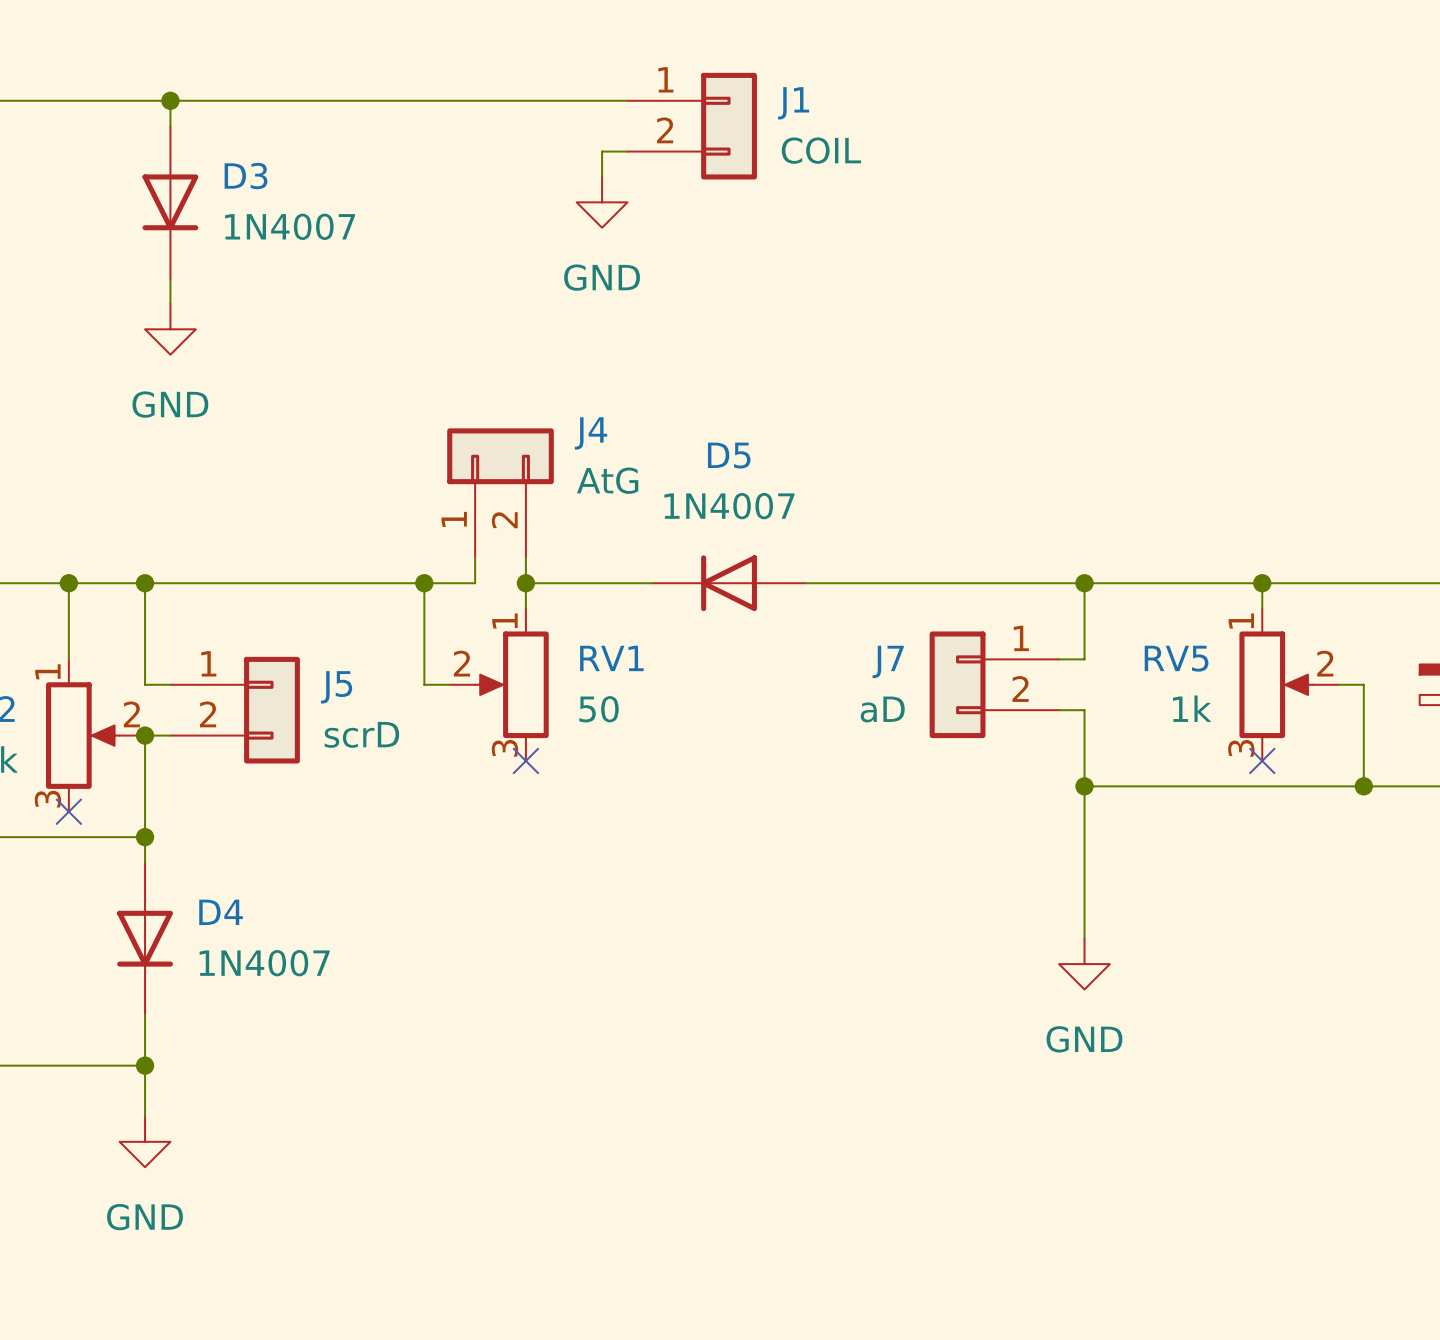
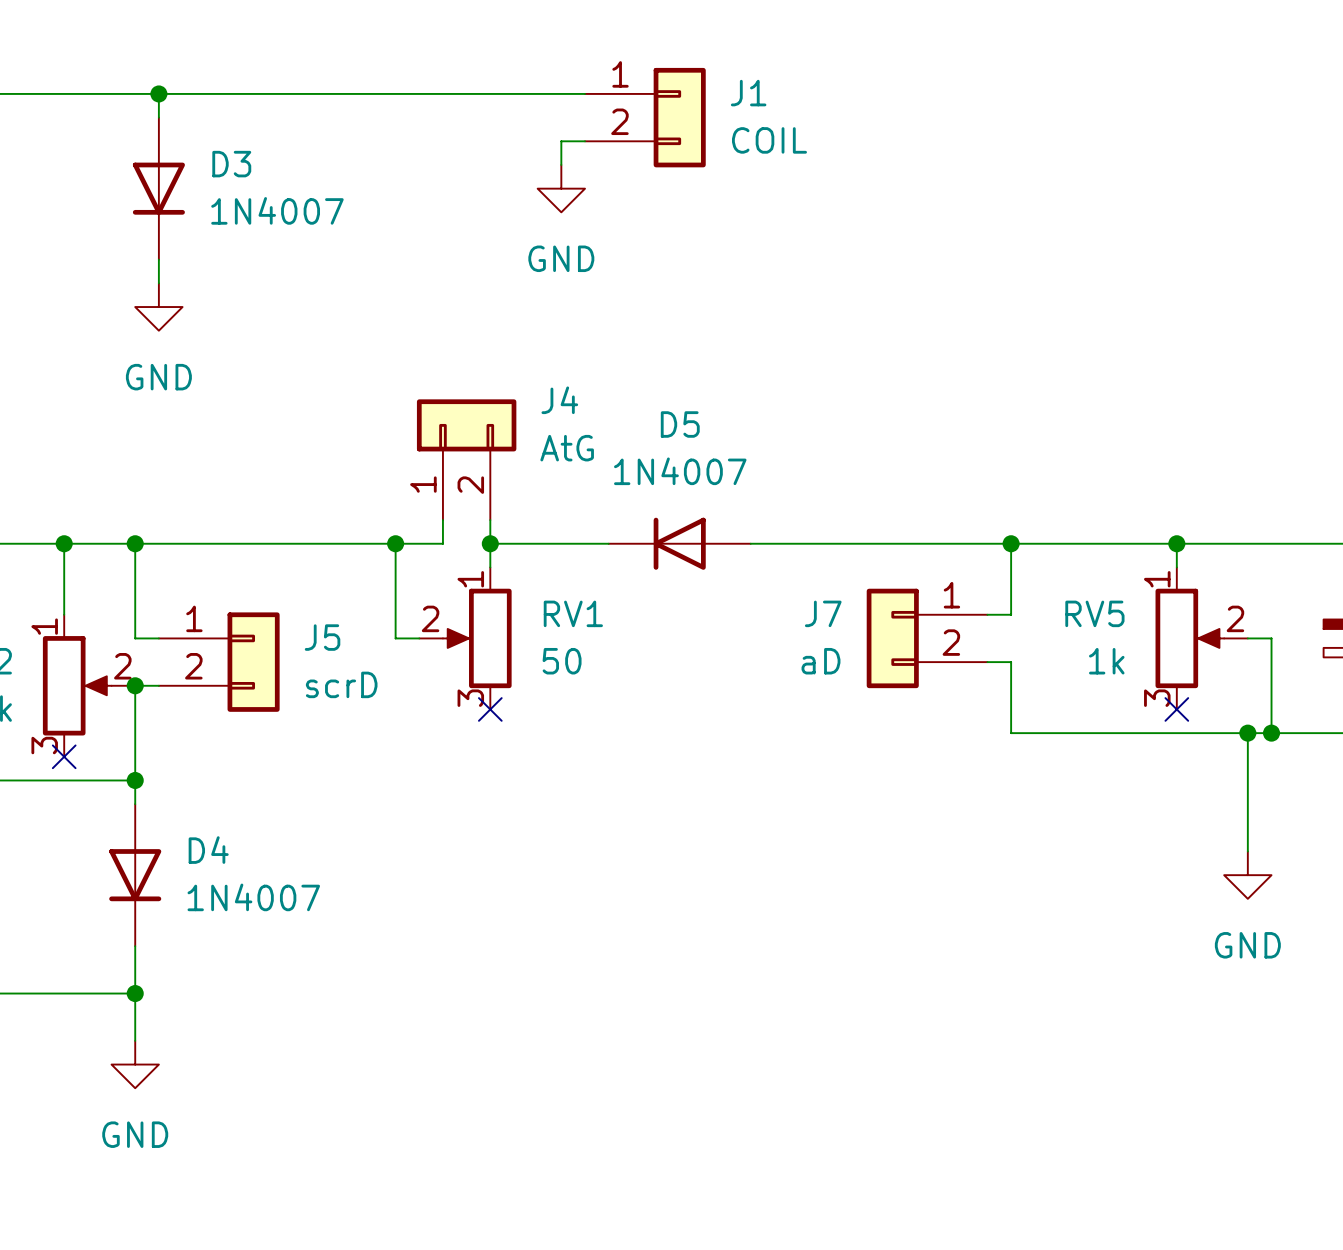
wire: (1084, 786) (1084, 938) -> none
junction: (1084, 786) -> none
wire: none -> (1247, 733) (1247, 851)
junction: none -> (1247, 733)
power symbol position: GND (1084, 964) -> GND (1247, 875)

